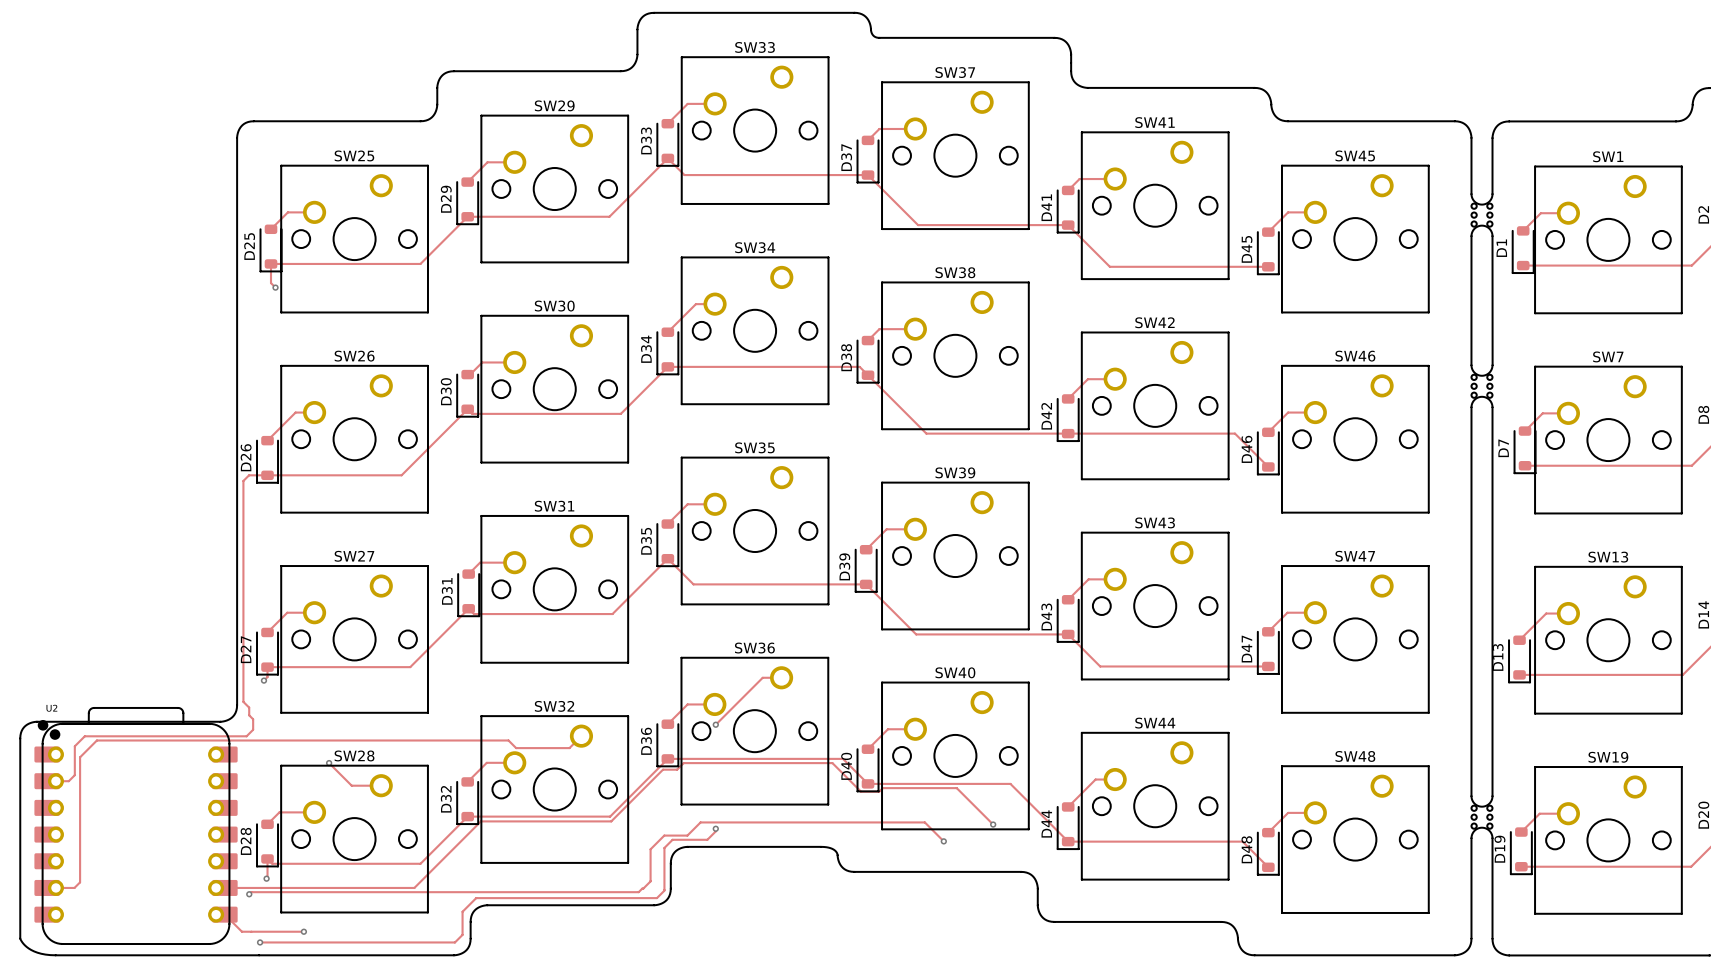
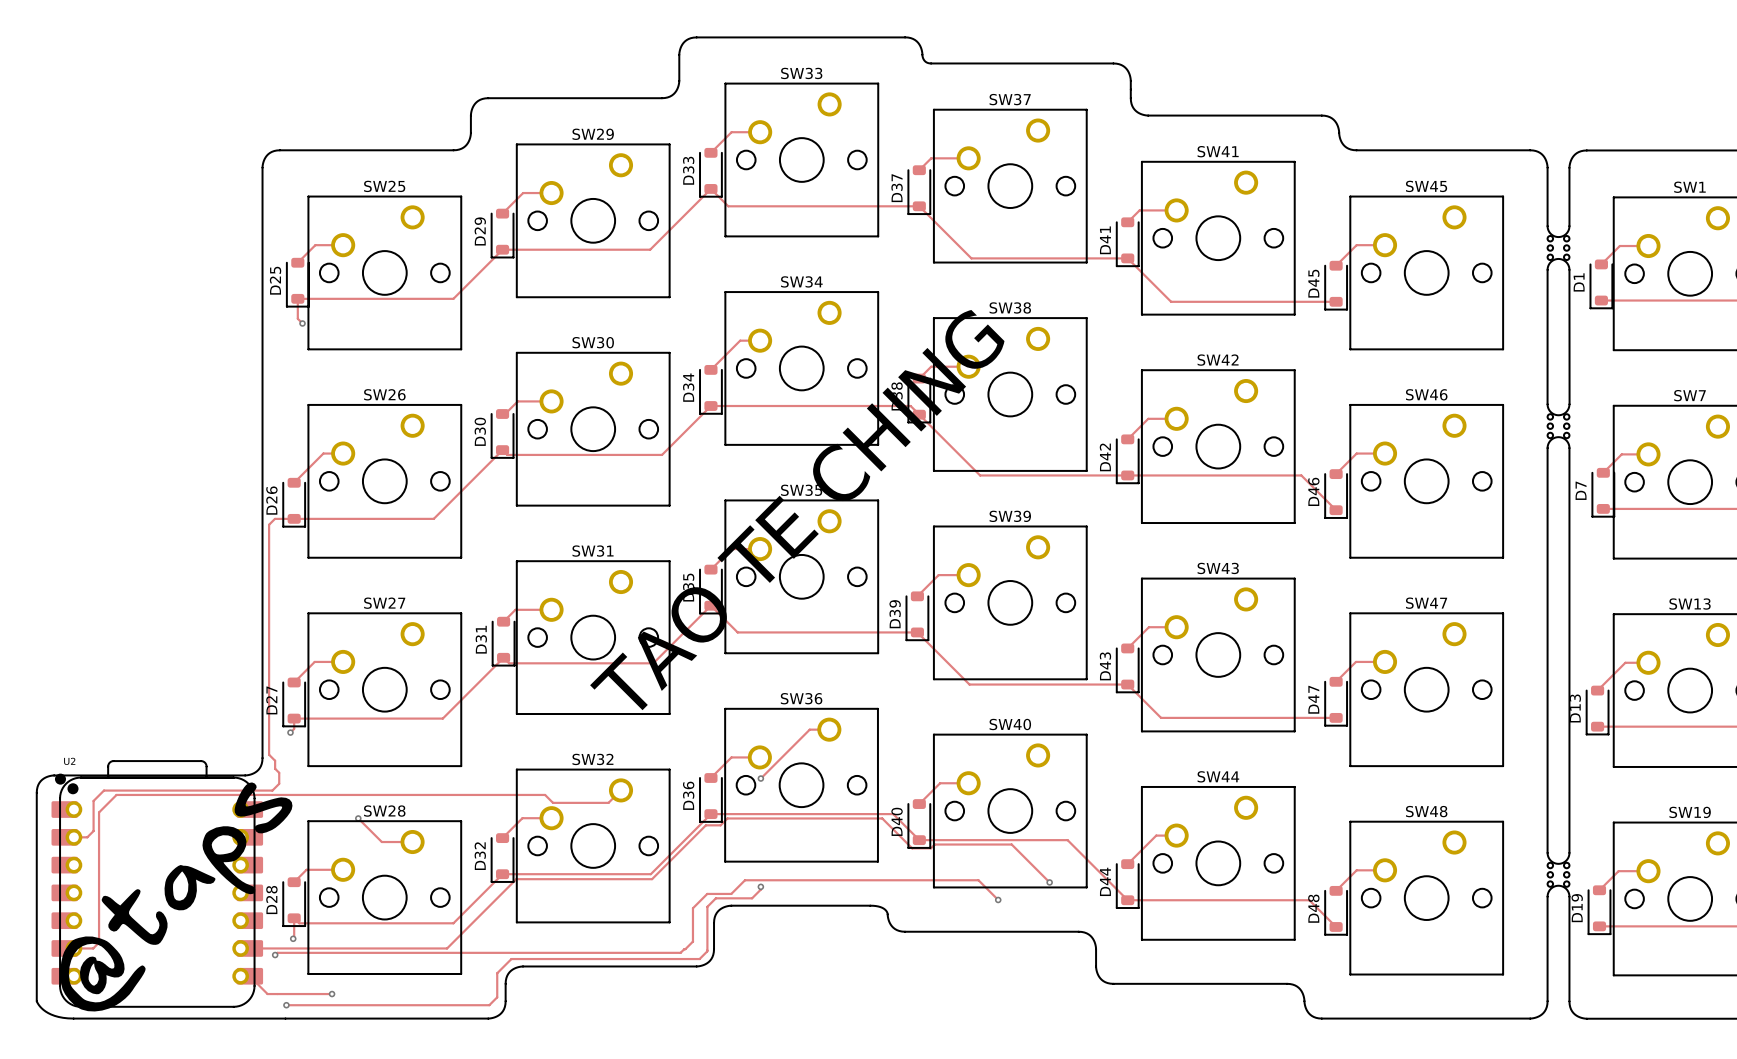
text: none -> TAO TE CHING (797, 510)
drawing: none -> [60, 782, 293, 1012]

